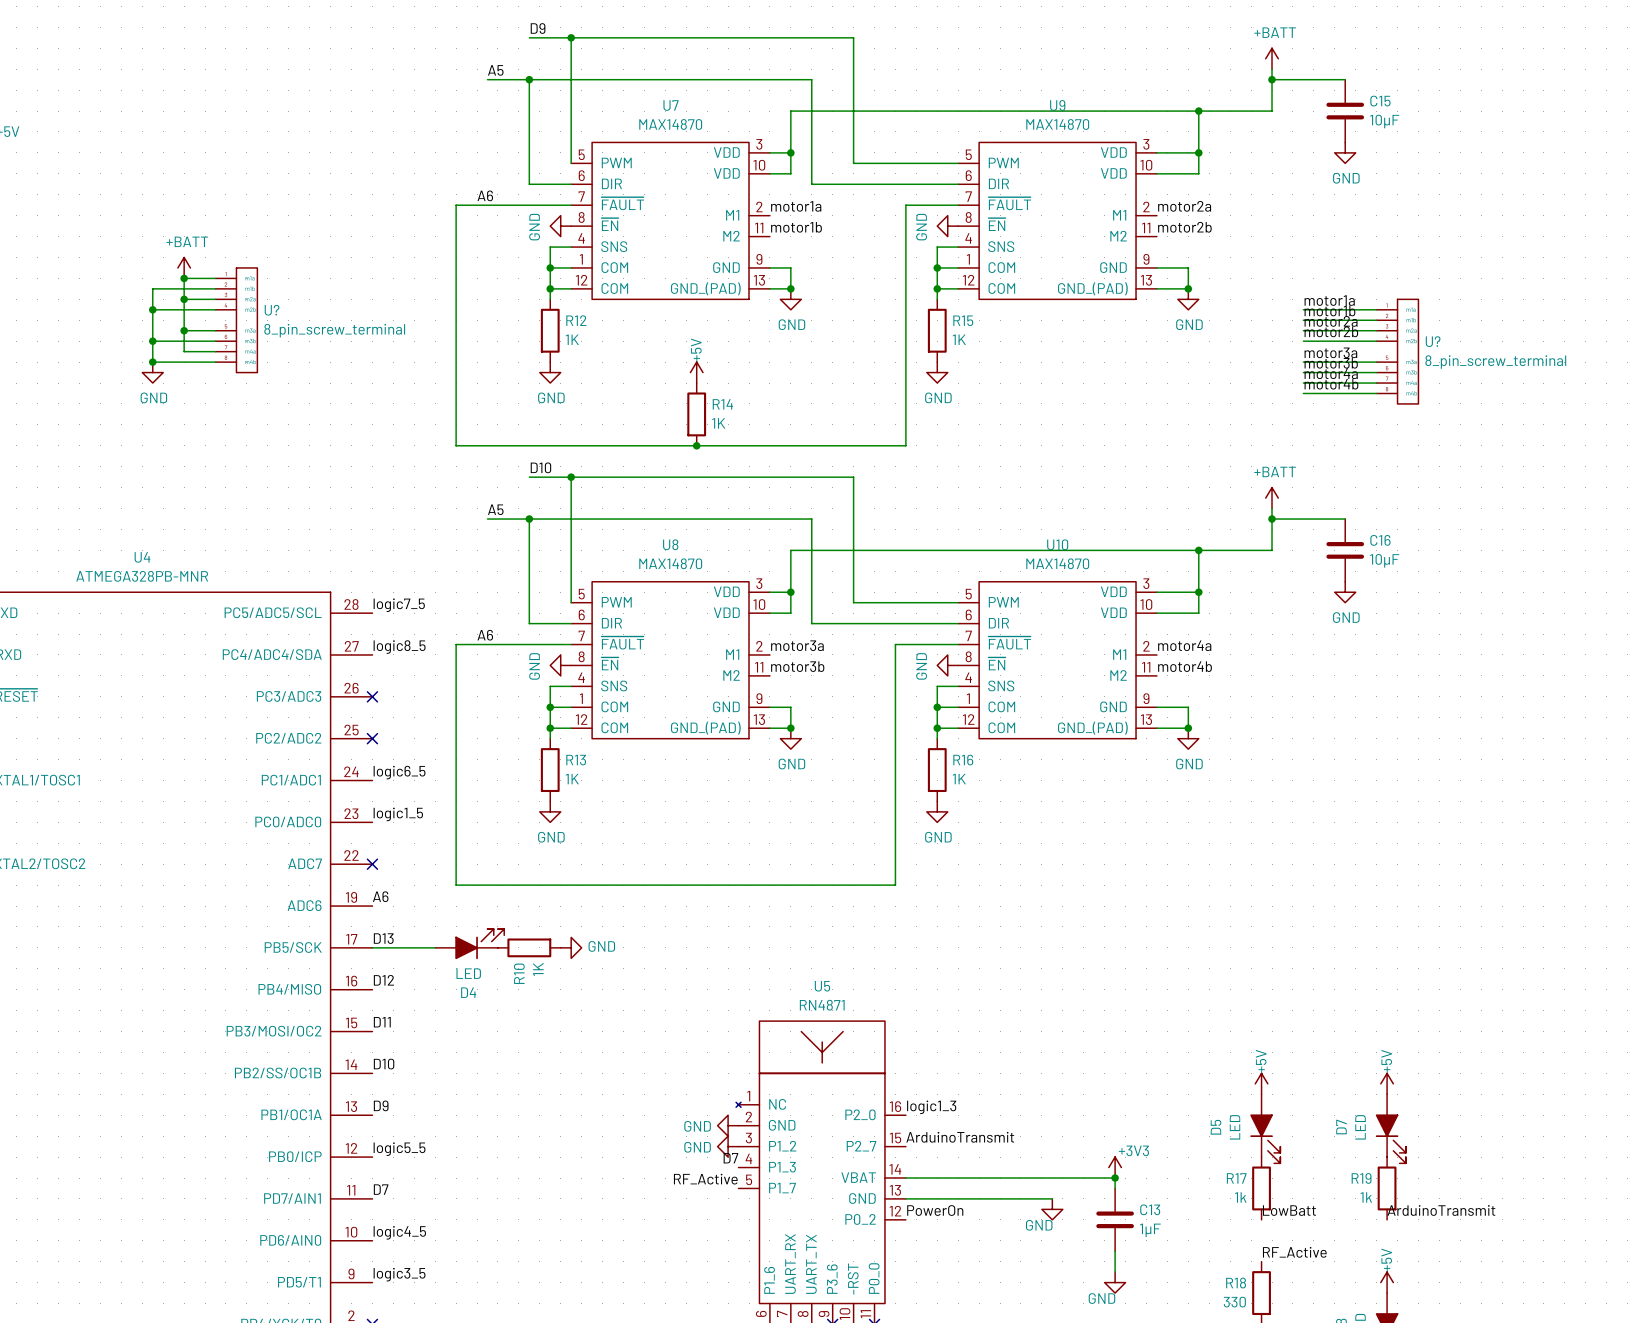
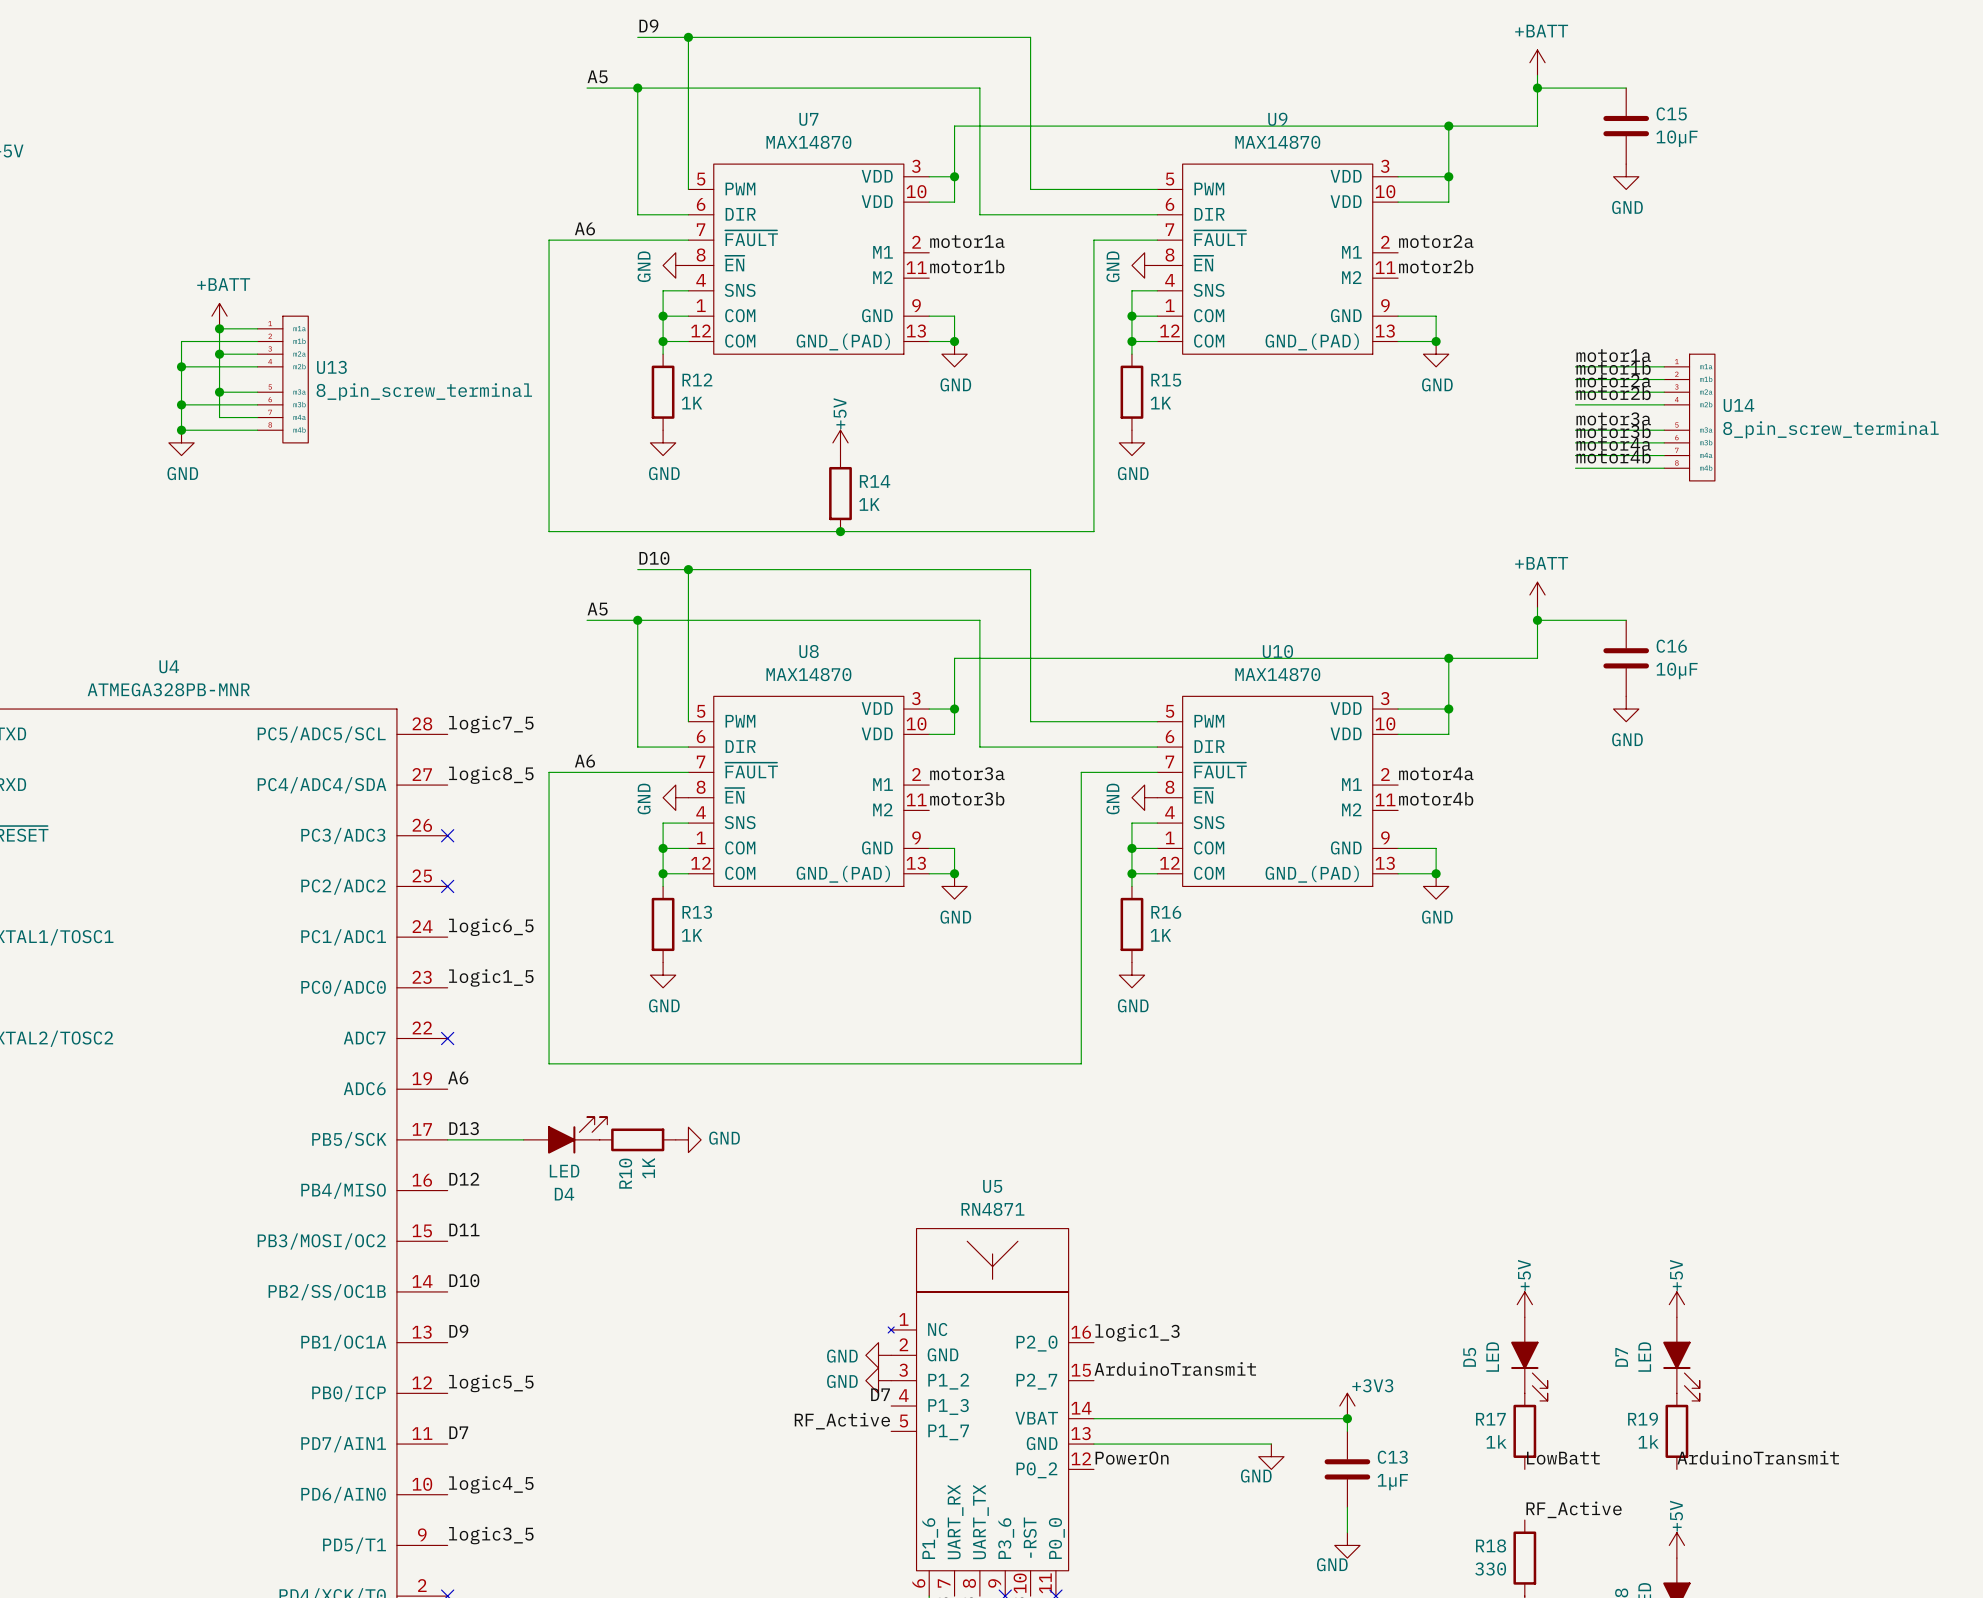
U? name: U? (272, 310) -> U13 (331, 367)
U? name: U? (1433, 341) -> U14 (1738, 405)

